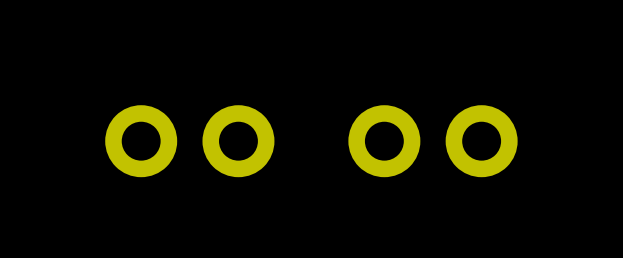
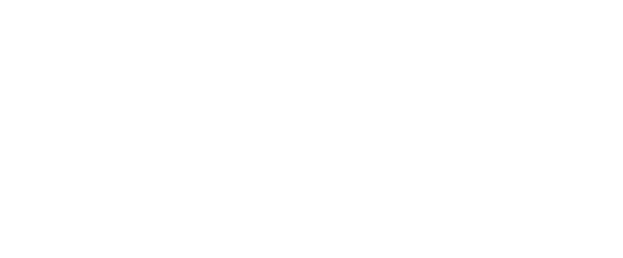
part: (189, 141) -> none
part: (433, 141) -> none

